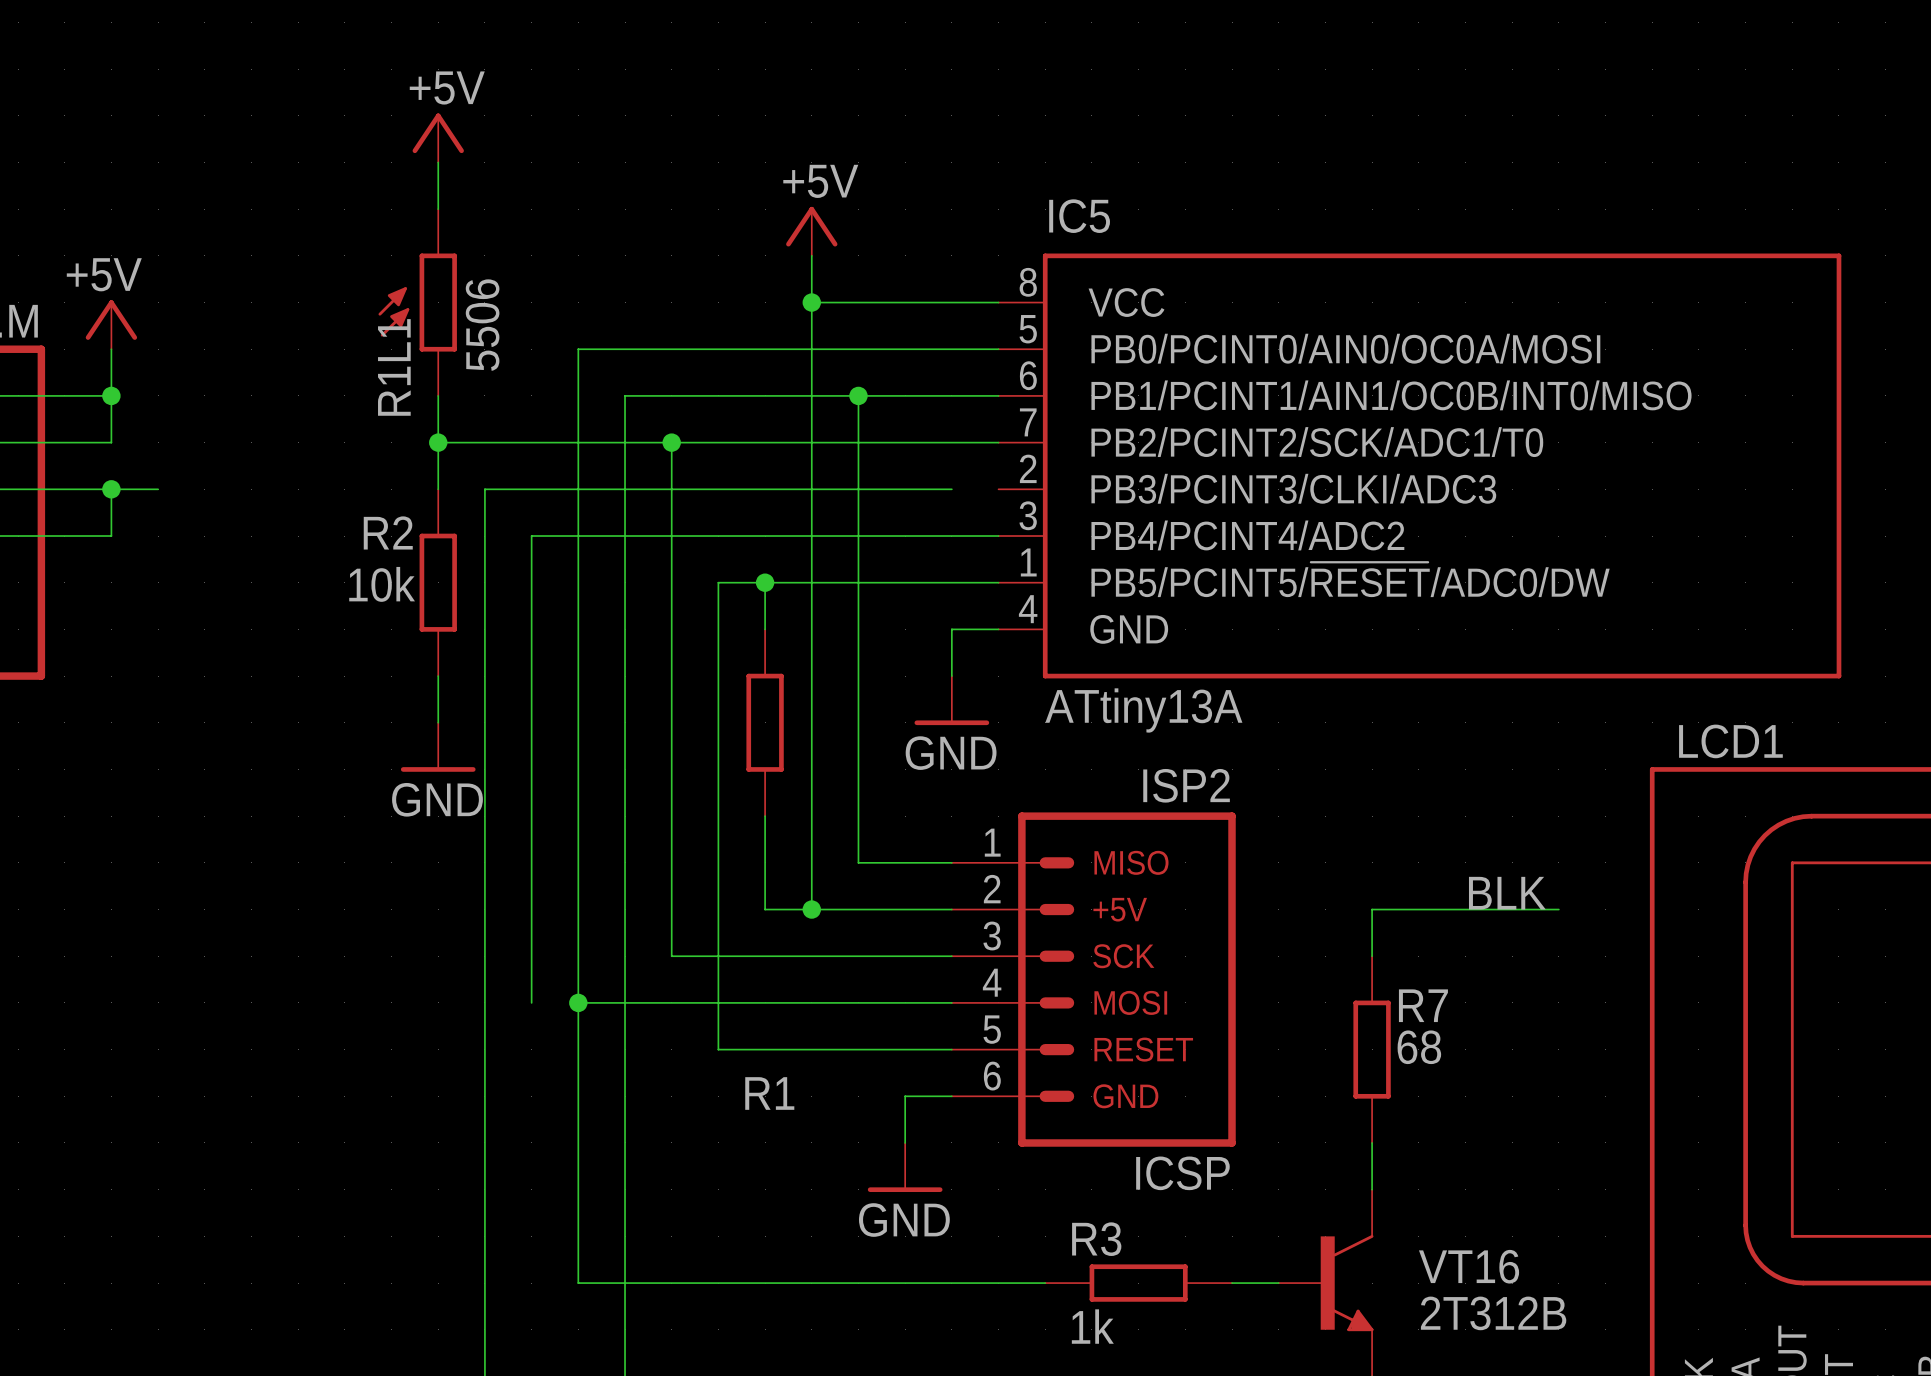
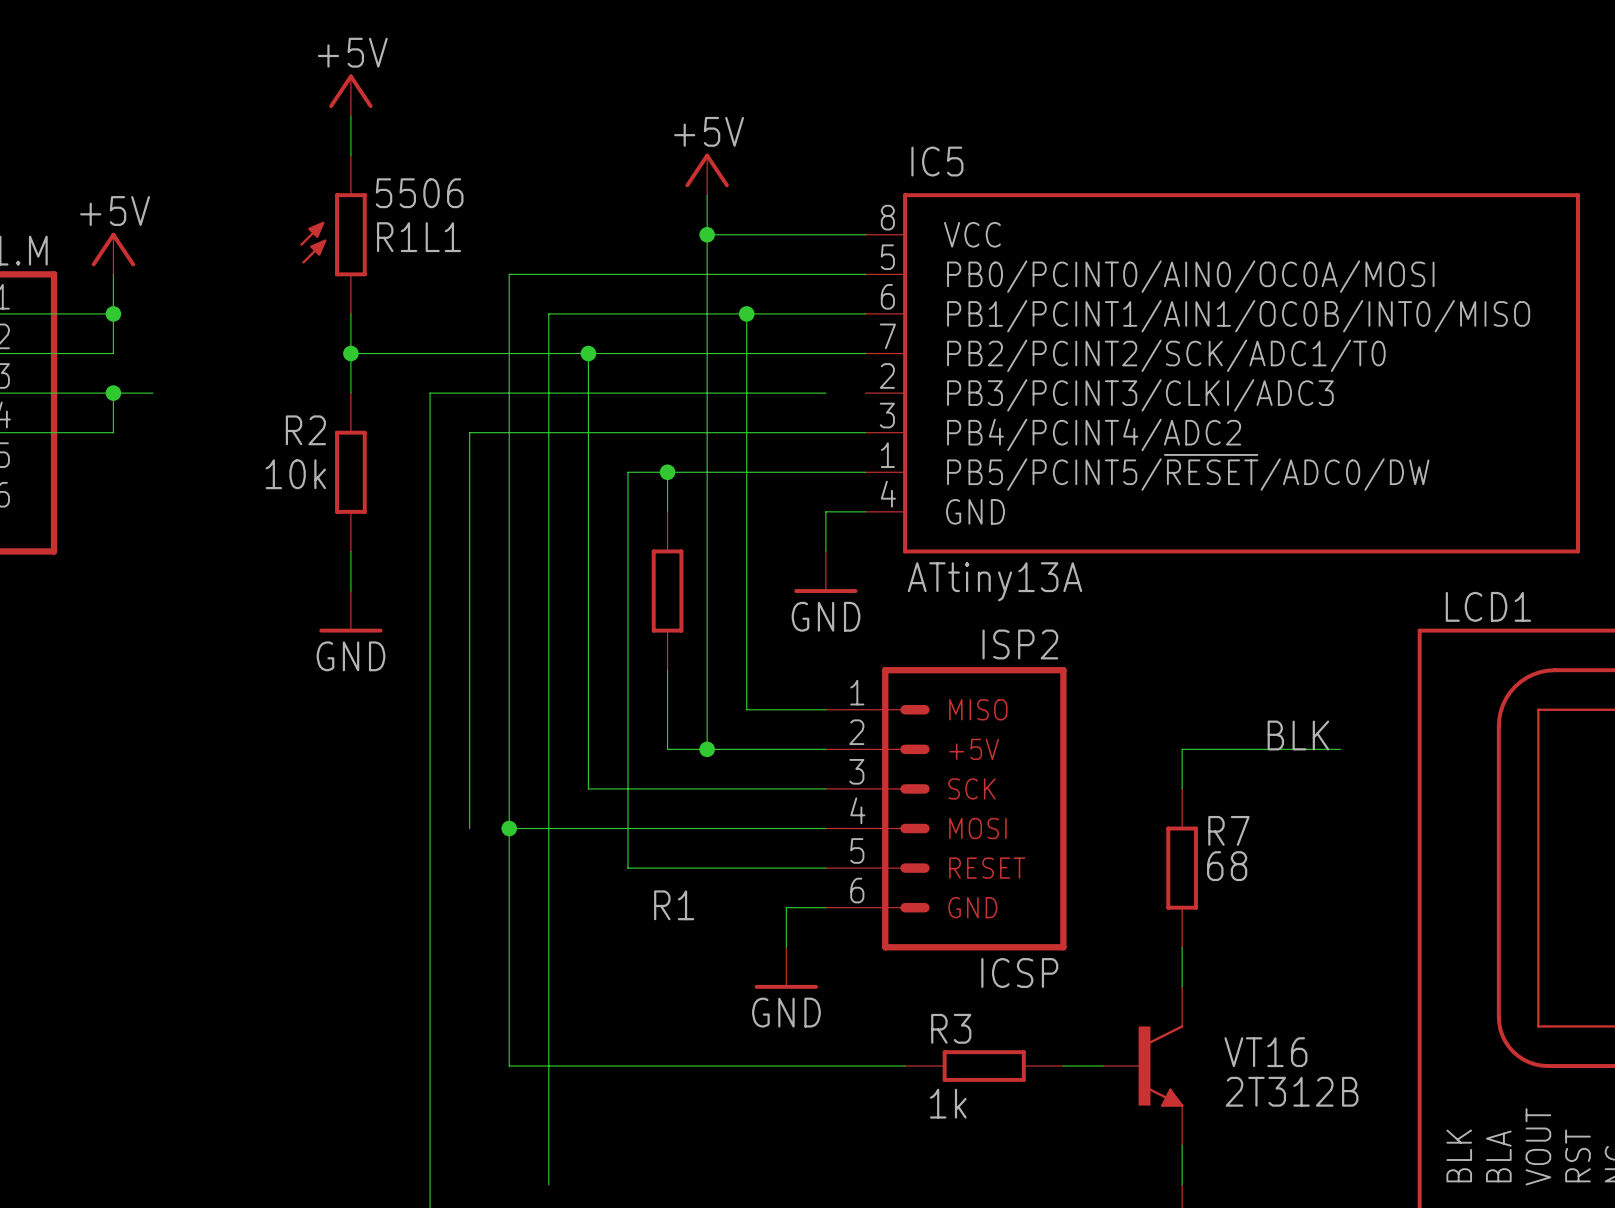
power symbol position: +5V (438, 137) -> +5V (350, 95)
wire: (438, 162) (438, 209) -> (350, 116) (350, 155)
R1L1 position: (417, 302) -> (333, 234)
R1L1 value rotation: 0° (482, 325) -> 90° clockwise (419, 193)
R1L1 name rotation: 0° (394, 367) -> 90° clockwise (419, 237)
wire: (438, 395) (438, 489) -> (350, 313) (350, 393)
wire: none -> (350, 353) (390, 353)
junction position: (438, 442) -> (350, 353)
R2 position: (438, 582) -> (350, 472)
wire: (438, 676) (438, 722) -> (350, 551) (350, 591)
power symbol position: GND (438, 747) -> GND (350, 611)

